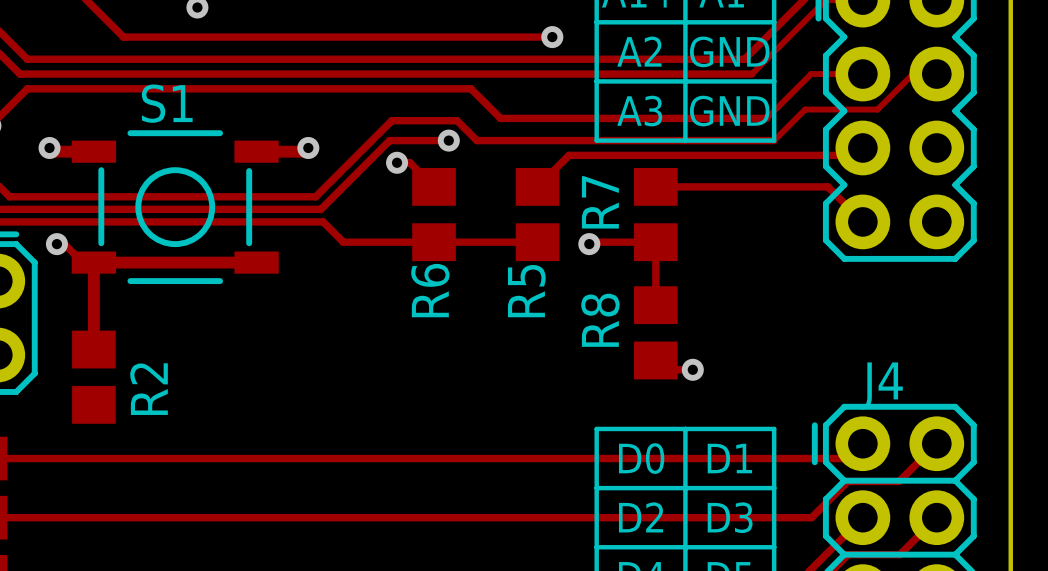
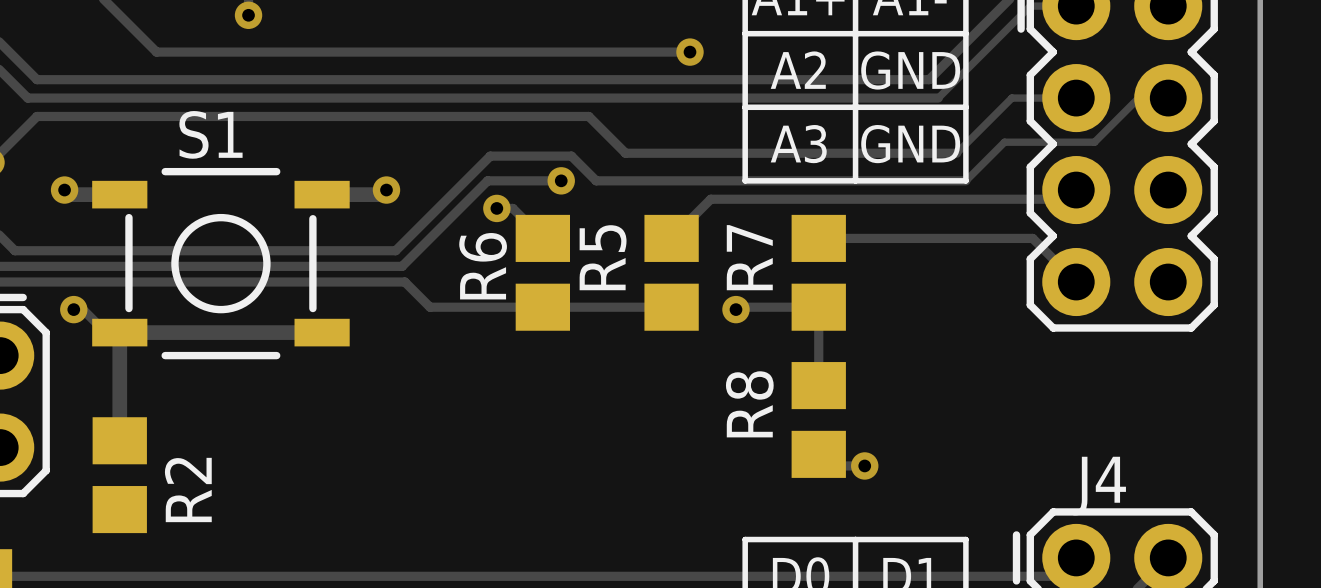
R6 name position: R6 (430, 290) -> R6 (483, 266)
R5 name position: R5 (526, 291) -> R5 (603, 257)

